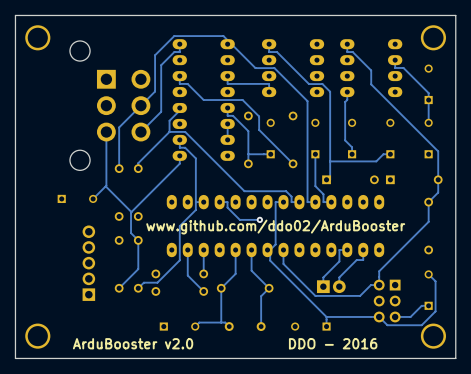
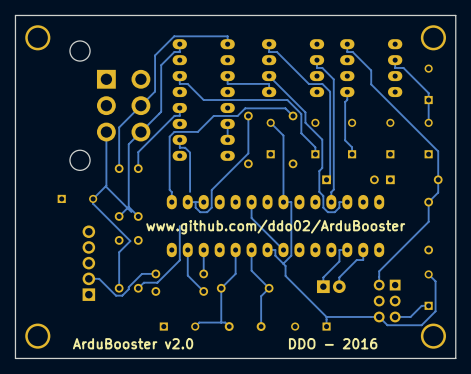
track: (155, 55) (174, 36) (223, 36) (255, 68) (274, 68) (307, 101) (307, 202) (315, 202) -> (155, 55) (174, 36) (227, 36) (227, 40)
track: none -> (269, 76) (305, 112) (305, 122) (322, 139) (322, 168) (319, 171) (319, 191) (323, 195) (323, 207) (327, 212) (334, 212) (339, 207) (339, 202) (347, 202)
track: (242, 100) (259, 116) (259, 129) (293, 163) -> (242, 100) (287, 100) (301, 113) (301, 133) (315, 147) (315, 154)
track: (227, 107) (227, 115) (233, 115) (248, 131) -> (248, 115) (248, 131)
track: (179, 110) (169, 120) (169, 131) -> none
track: none -> (270, 122) (283, 135) (283, 202) (291, 202) (291, 255) (283, 263)
track: (169, 131) (138, 163) -> (179, 110) (179, 115) (174, 115) (138, 152) (138, 163)
track: (174, 131) (169, 131) -> (174, 131) (169, 136) (169, 189) (171, 192) (171, 202)
track: (185, 131) (244, 191) (286, 191) (291, 196) (291, 202) (299, 202) -> (185, 131) (197, 131) (213, 115) (237, 115) (245, 108) (285, 108) (293, 115)
track: none -> (140, 132) (128, 144) (128, 206)
track: (190, 152) (195, 158) (195, 209) (179, 226) -> (190, 152) (190, 191)
track: (248, 153) (248, 163) -> (248, 153) (211, 190) (211, 207) (207, 212) (200, 212) (195, 207) (195, 202) (187, 202)
track: (270, 154) (248, 154) -> none
track: (315, 154) (315, 186) (323, 194) (323, 202) (331, 202) -> (316, 60) (316, 67) (322, 67) (333, 79) (333, 189) (331, 192) (331, 202)
track: (390, 154) (383, 154) (376, 161) (330, 161) -> none
track: (179, 155) (179, 163) (131, 212) (131, 233) (138, 240) (138, 269) (119, 288) -> (93, 198) (93, 203) (130, 241) (119, 252) (119, 288)
track: (219, 202) (227, 202) (227, 207) (239, 219) (259, 219) -> none
track: (283, 202) (275, 202) (275, 244) (270, 249) (270, 260) (285, 275) -> (270, 249) (275, 249) (275, 255) (285, 265) (285, 275)
track: none -> (128, 206) (138, 216)
track: none -> (128, 206) (119, 216)
via: (259, 219) -> none
track: (283, 249) (283, 263) (315, 295) (360, 295) (370, 285) (379, 285) -> (283, 249) (251, 218) (251, 202)
track: none -> (155, 273) (142, 273) (122, 295) (115, 295) (99, 278) (88, 278)

